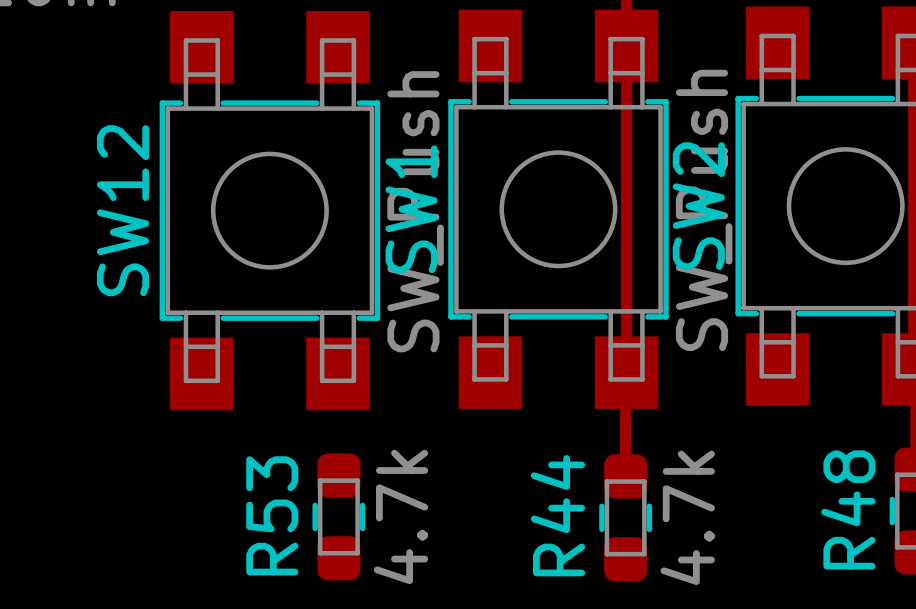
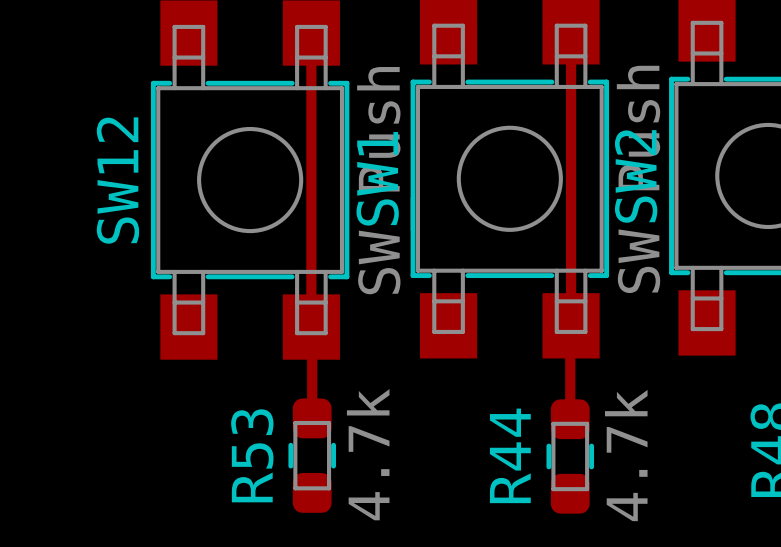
top track: none -> (311, 33) (311, 419)

